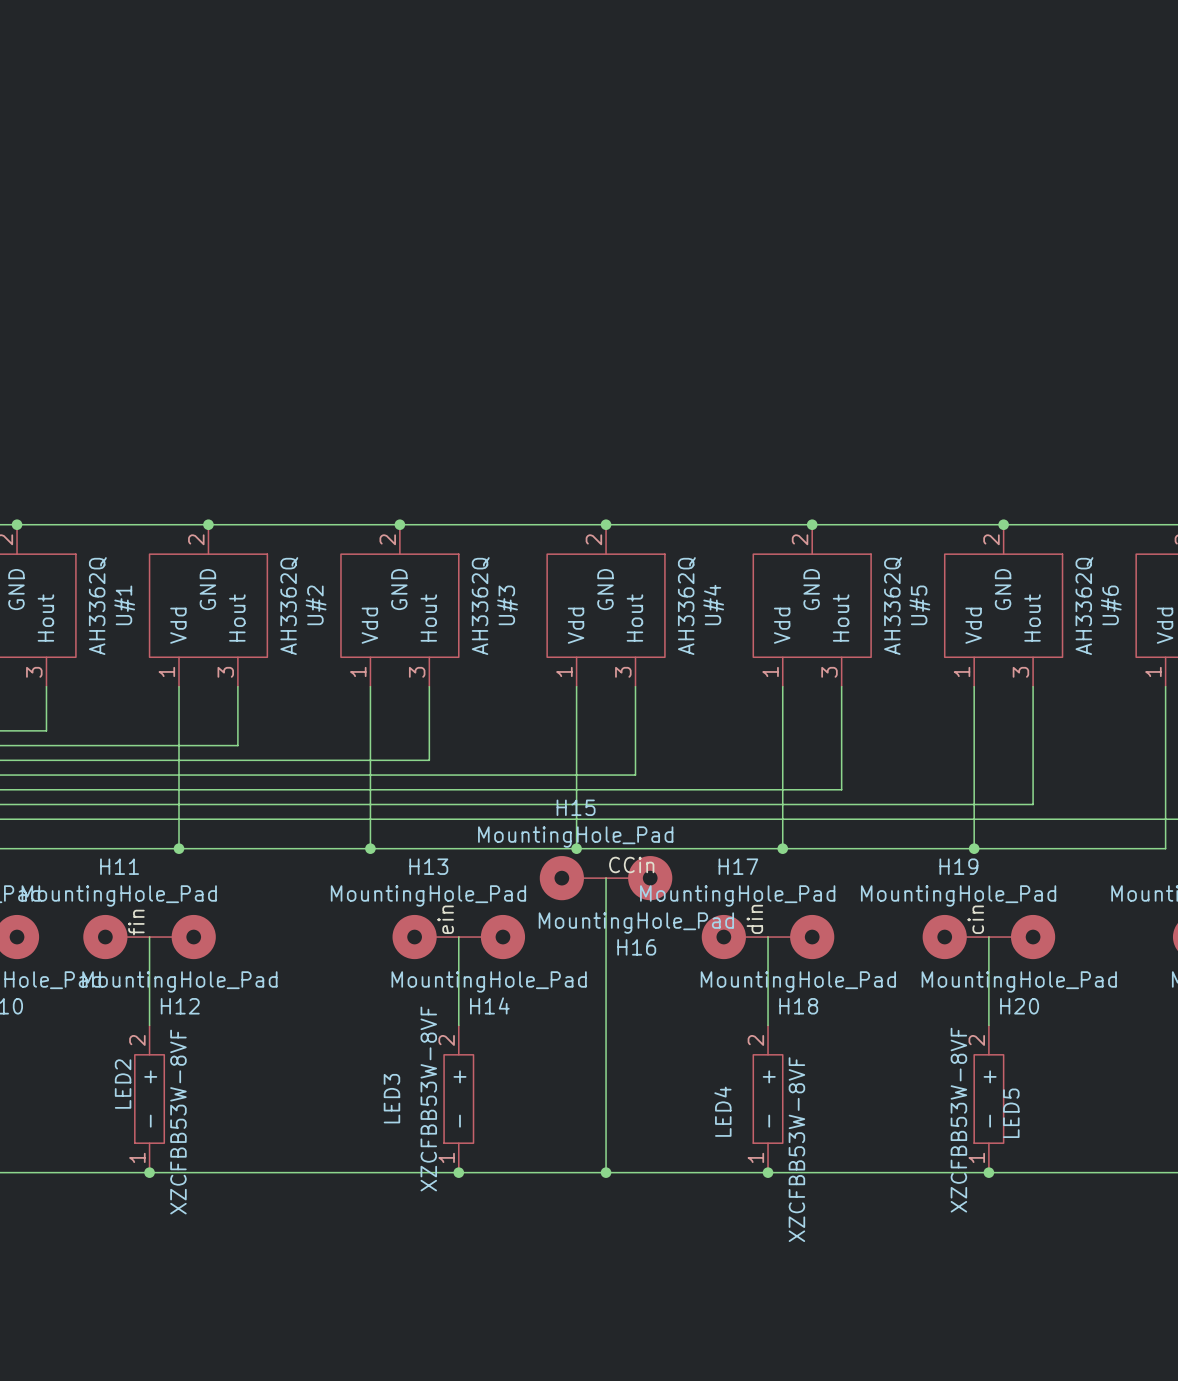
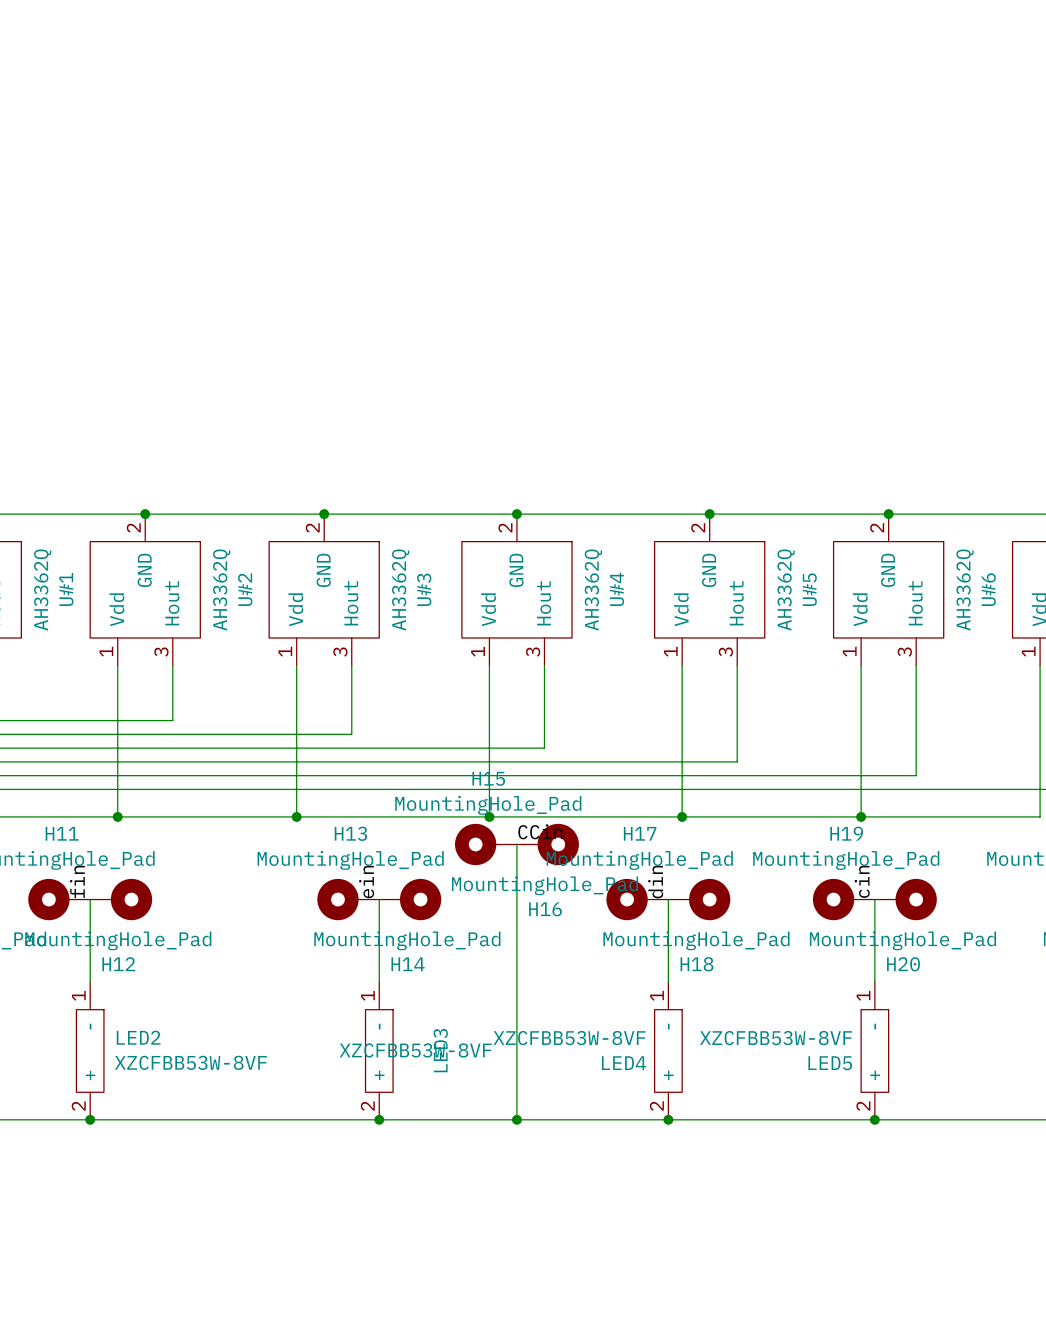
LED2 name position: LED2 (123, 1084) -> LED2 (138, 1037)
LED2 rotation: 0° (149, 1099) -> 180° (90, 1050)
LED3 rotation: 0° (458, 1099) -> 180° (379, 1050)
LED4 rotation: 0° (768, 1099) -> 180° (668, 1050)
LED5 rotation: 0° (988, 1099) -> 180° (874, 1050)
LED5 name position: LED5 (1011, 1113) -> LED5 (830, 1063)
LED5 value position: XZCFBB53W-8VF (958, 1120) -> XZCFBB53W-8VF (776, 1038)
LED2 value position: XZCFBB53W-8VF (178, 1122) -> XZCFBB53W-8VF (190, 1062)
LED4 value position: XZCFBB53W-8VF (796, 1149) -> XZCFBB53W-8VF (569, 1038)

